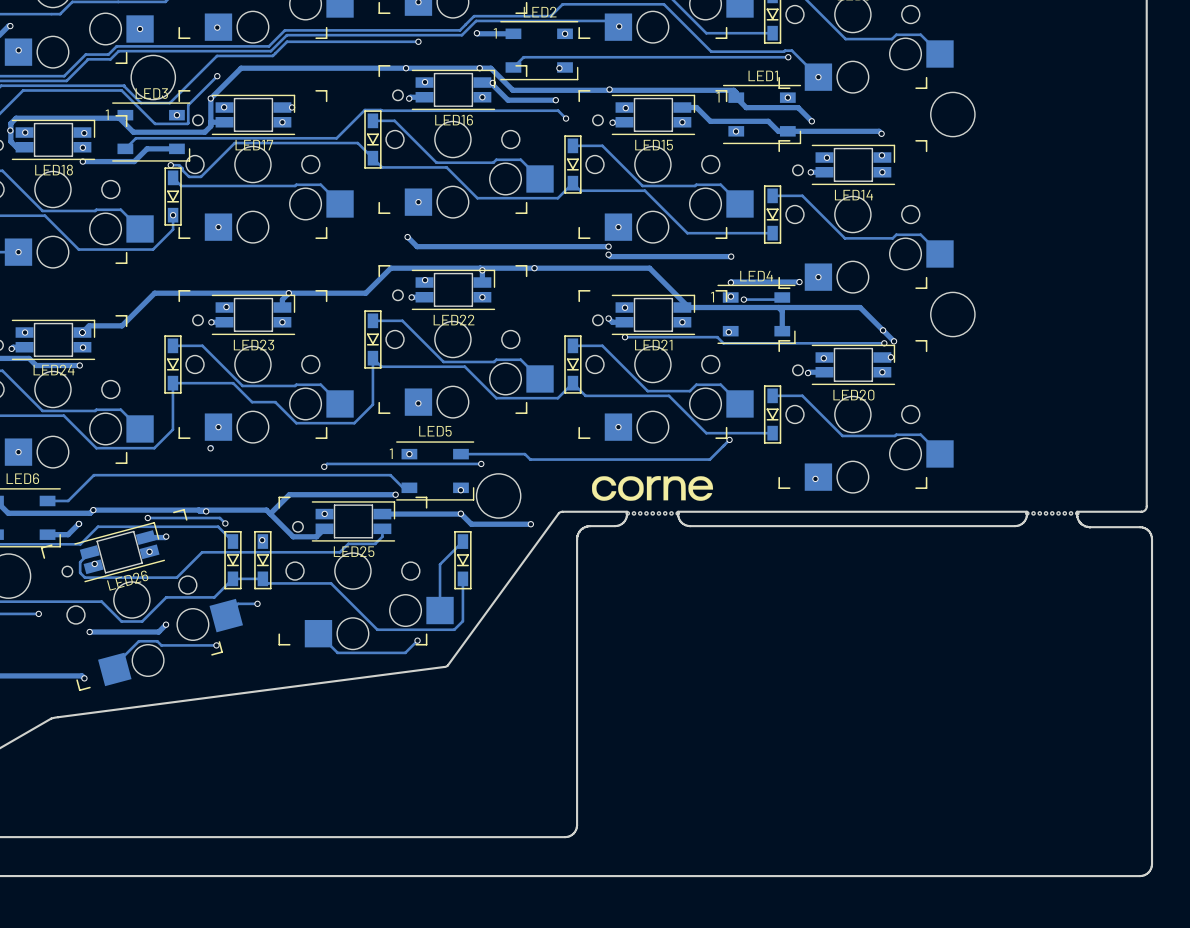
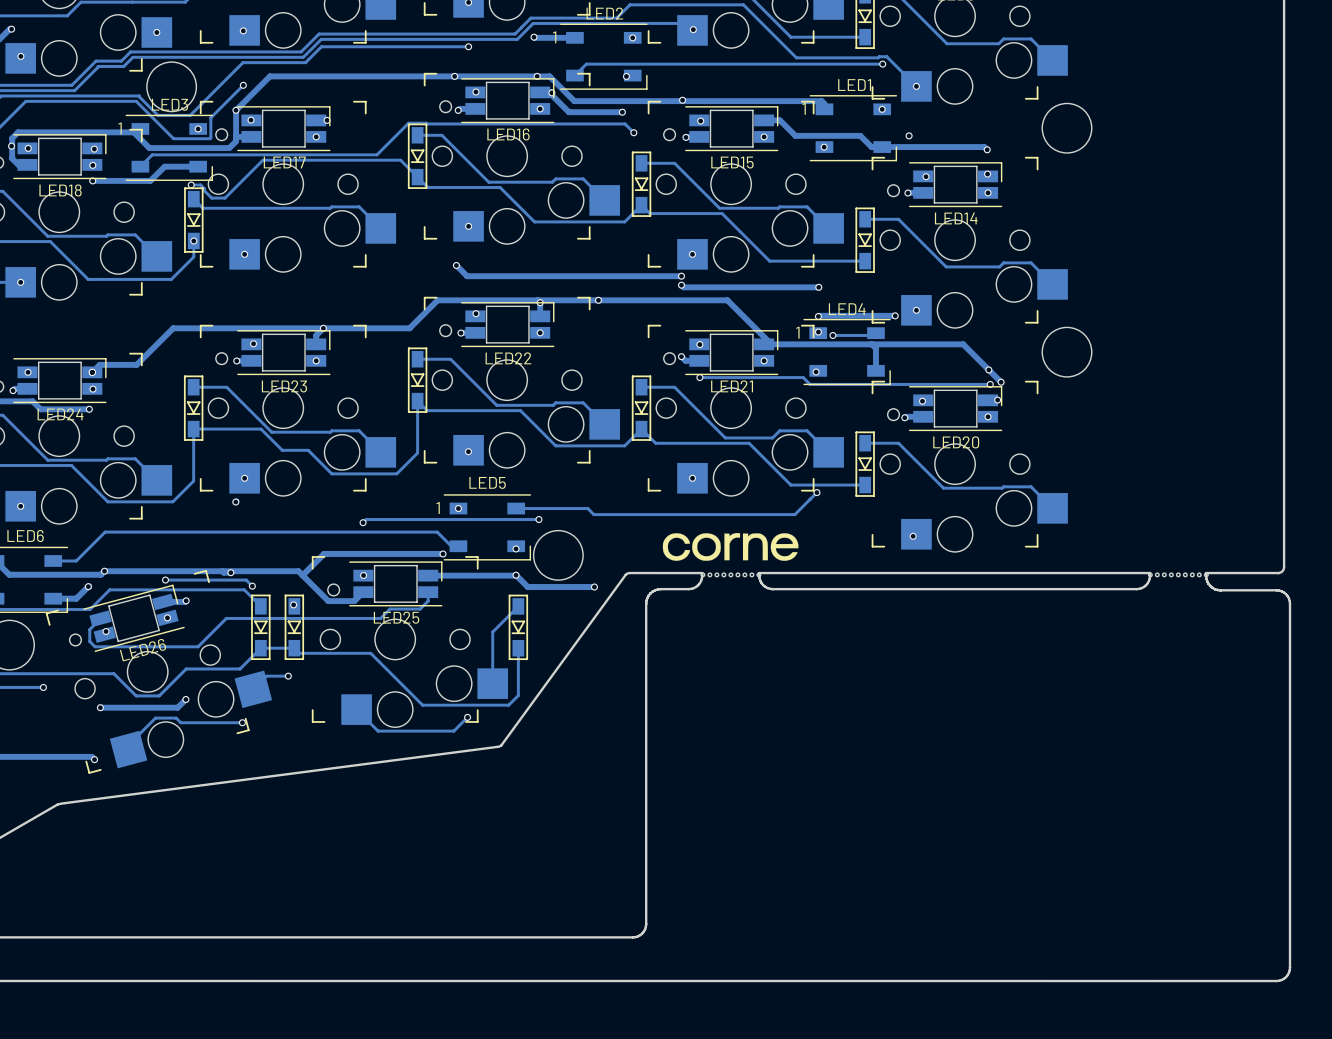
track: (736, 97) (746, 107) (798, 107) (811, 121) -> none

